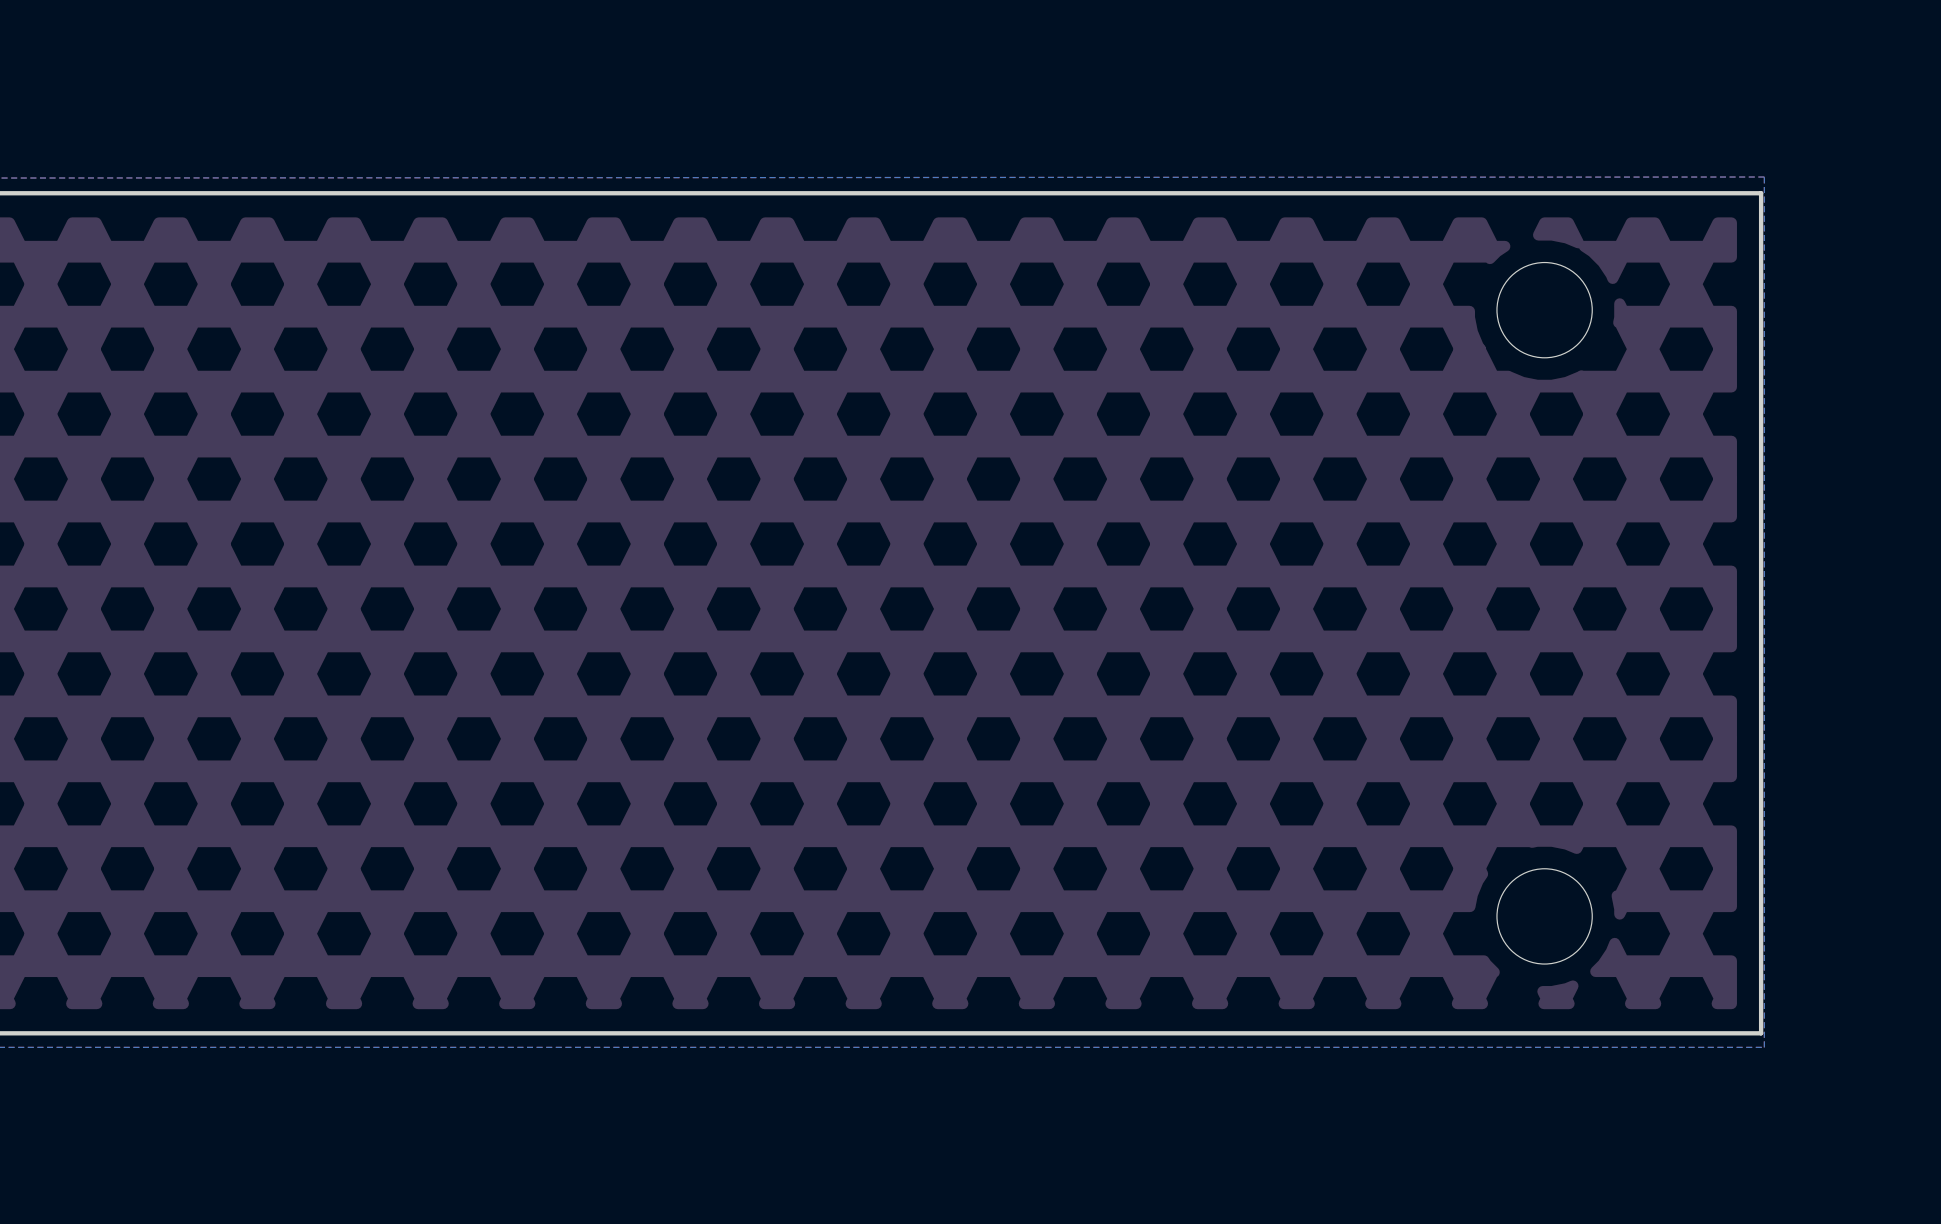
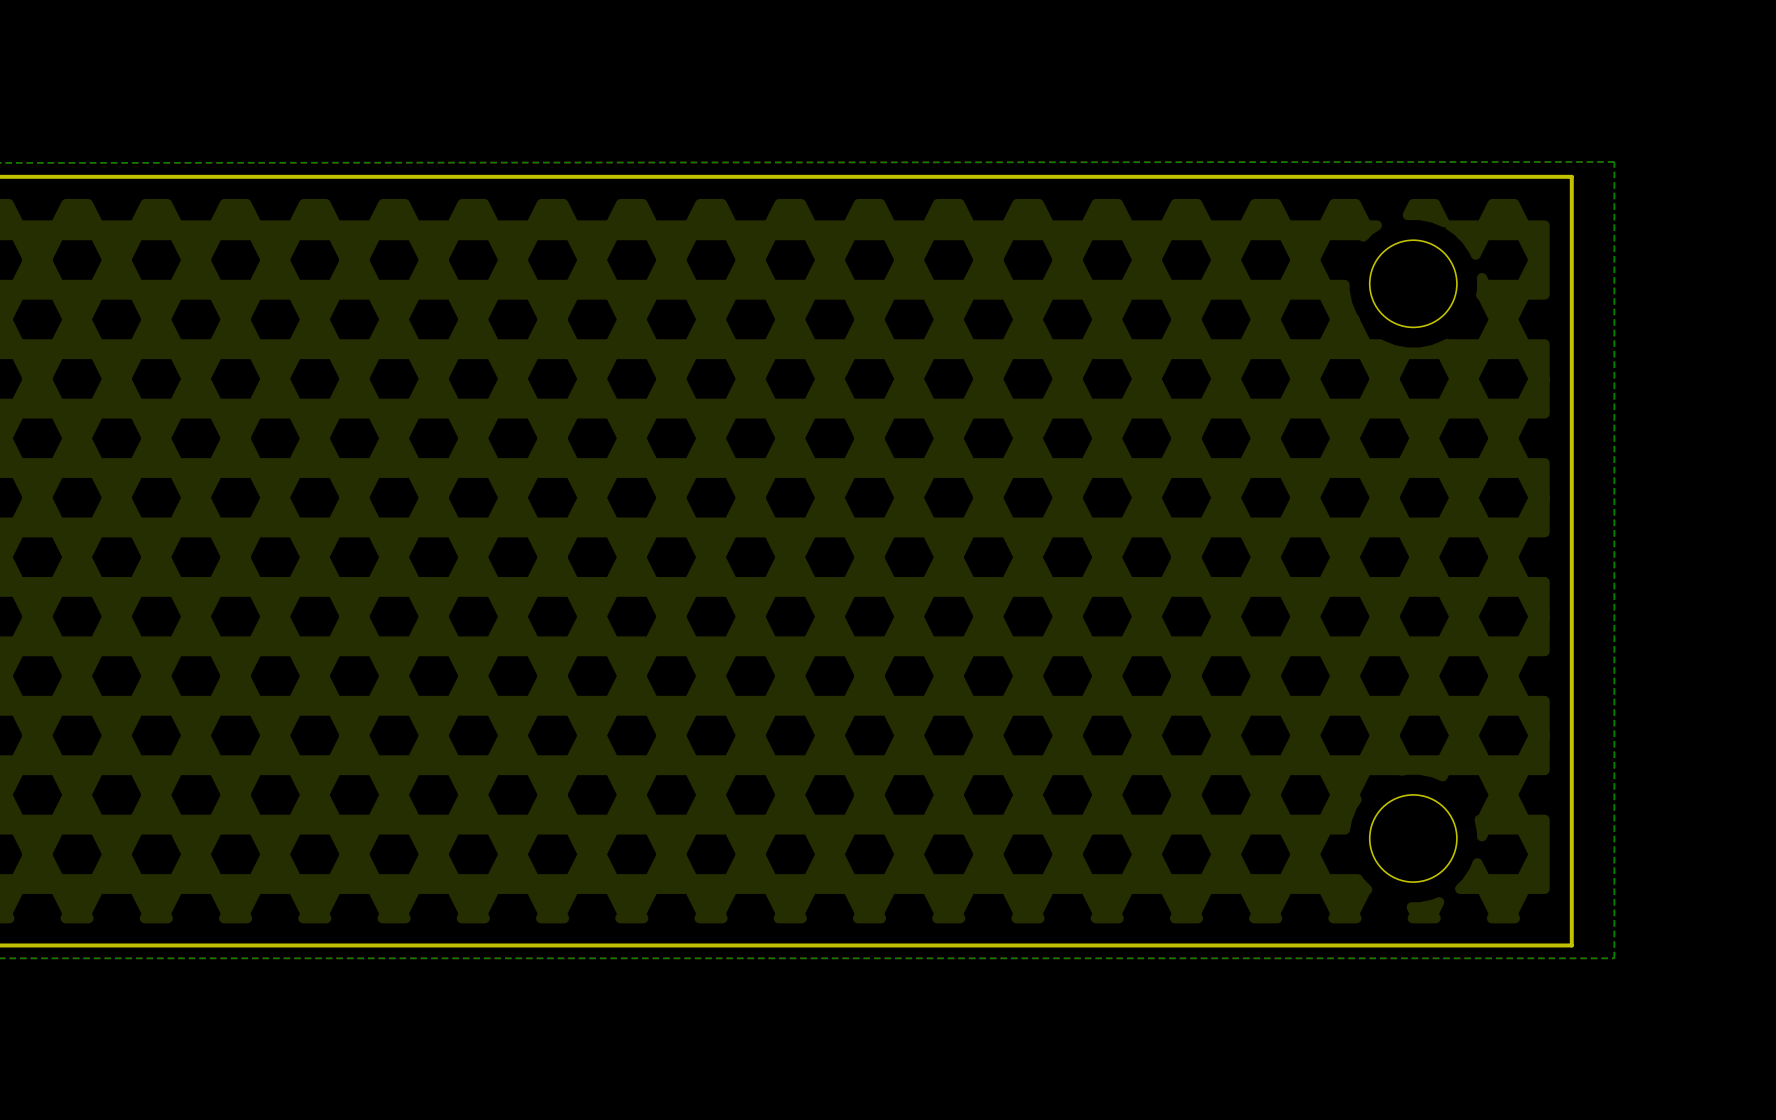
board edge: (1717, 193) (1761, 193) (1761, 1033) (1717, 1033) -> (1571, 176) (1571, 945)

